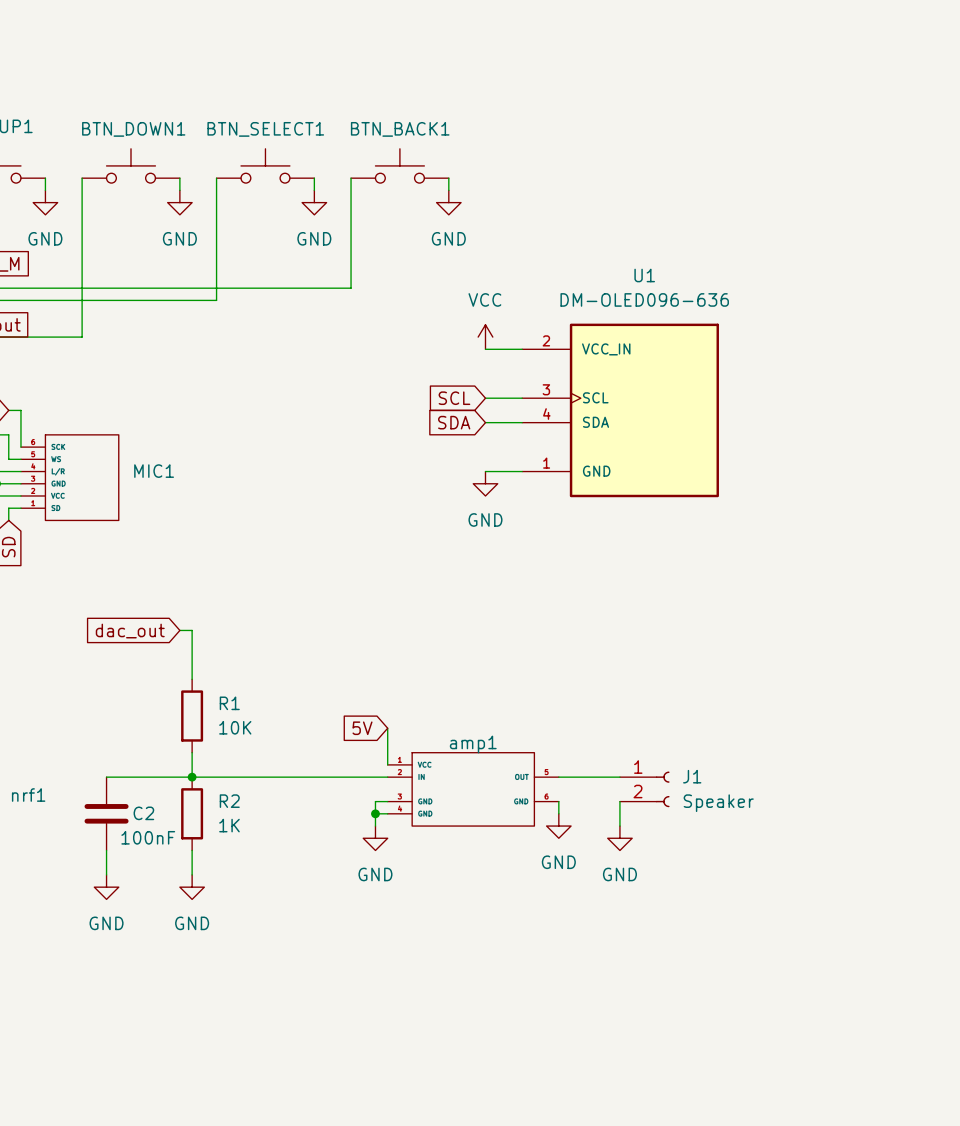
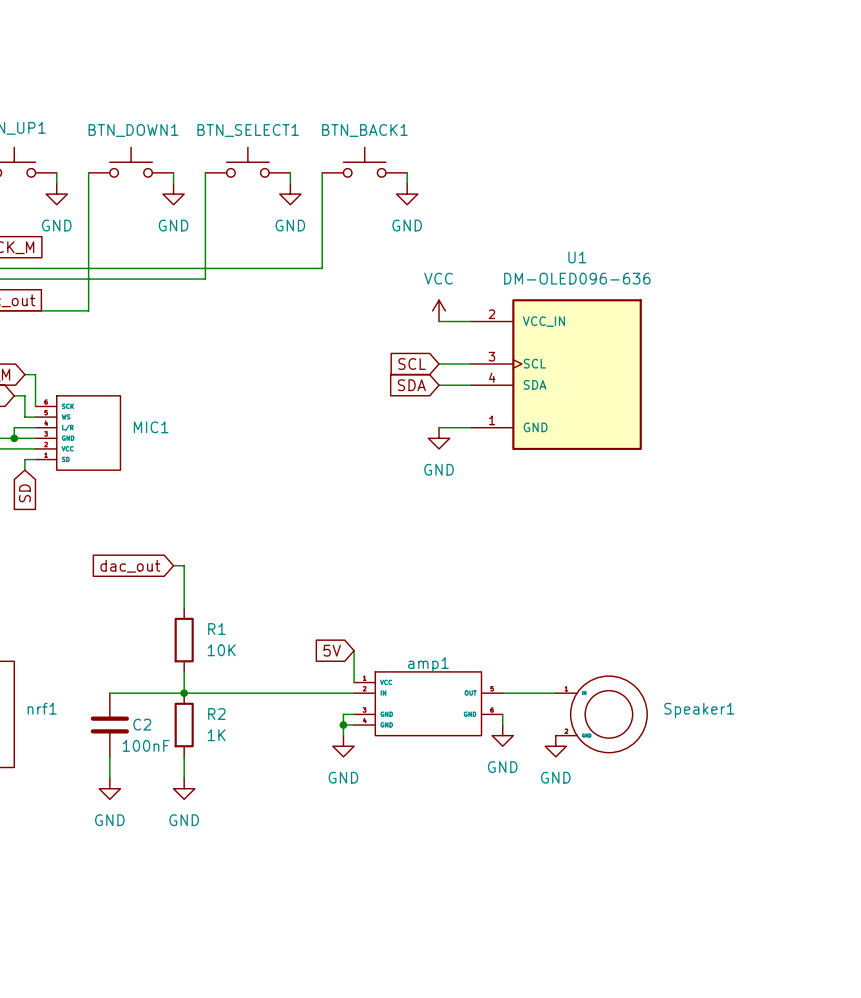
J1: Speaker (644, 789) -> none
wire: (619, 801) (619, 826) -> none
Speaker1: none -> (601, 714)

